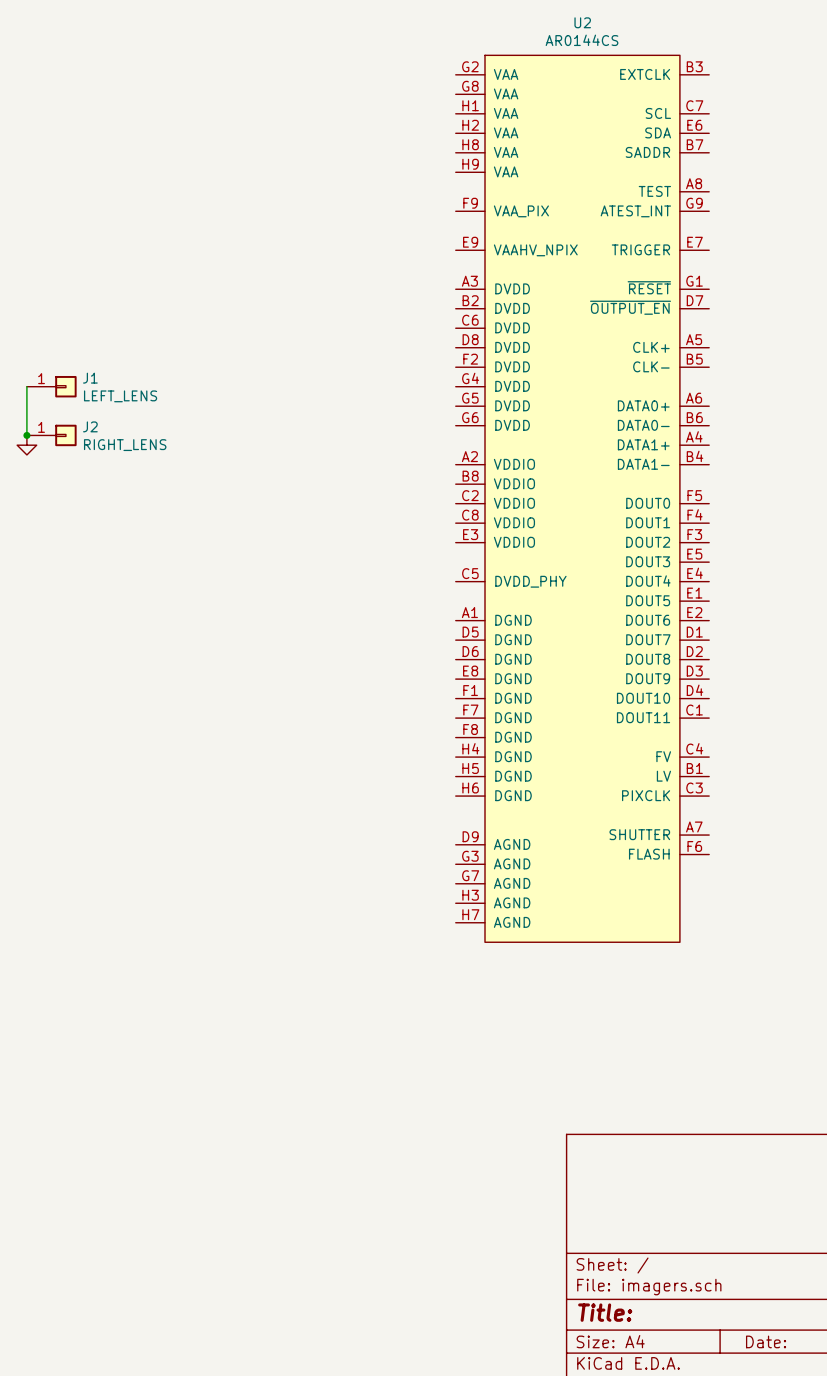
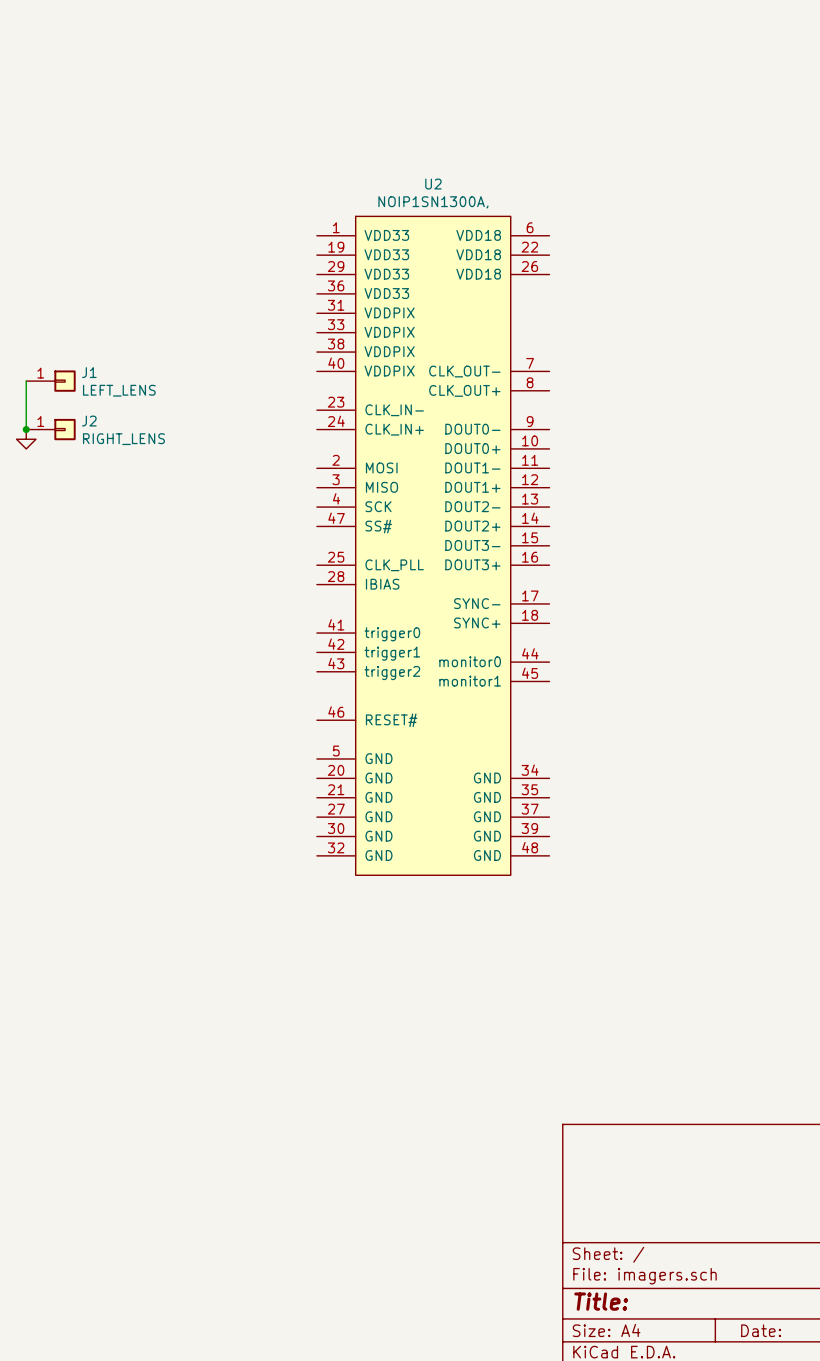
U2 name position: U2 (582, 22) -> U2 (433, 184)
U2 value: AR0144CS (581, 40) -> NOIP1SN1300A, (433, 202)
U2 symbol: [455, 55, 710, 943] -> [316, 216, 550, 876]

